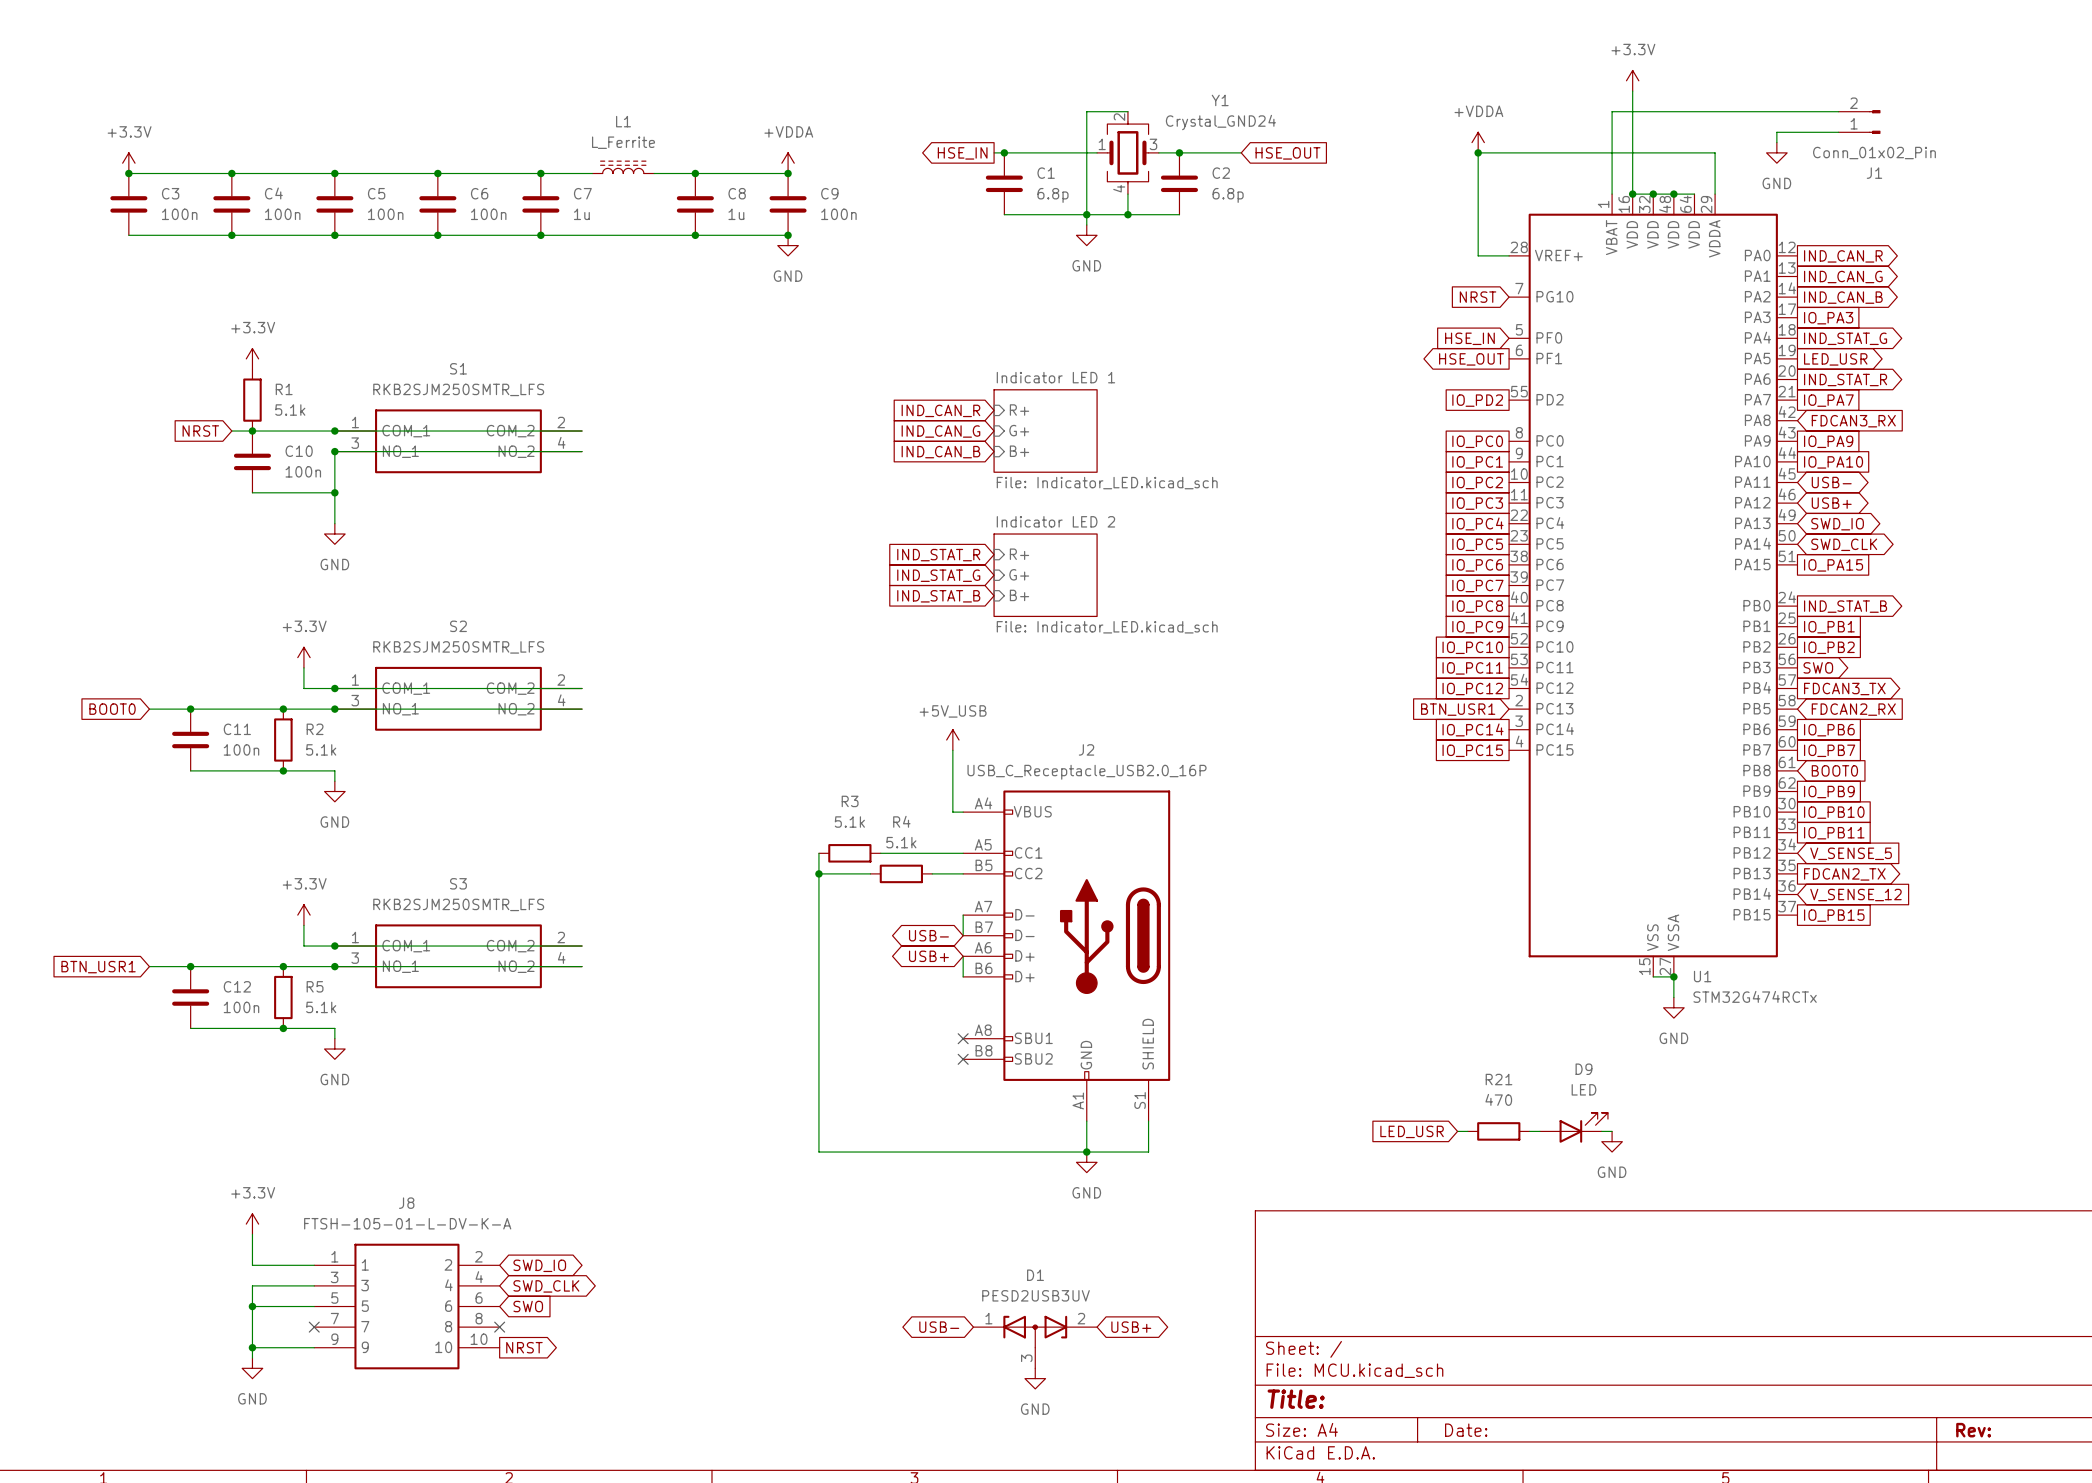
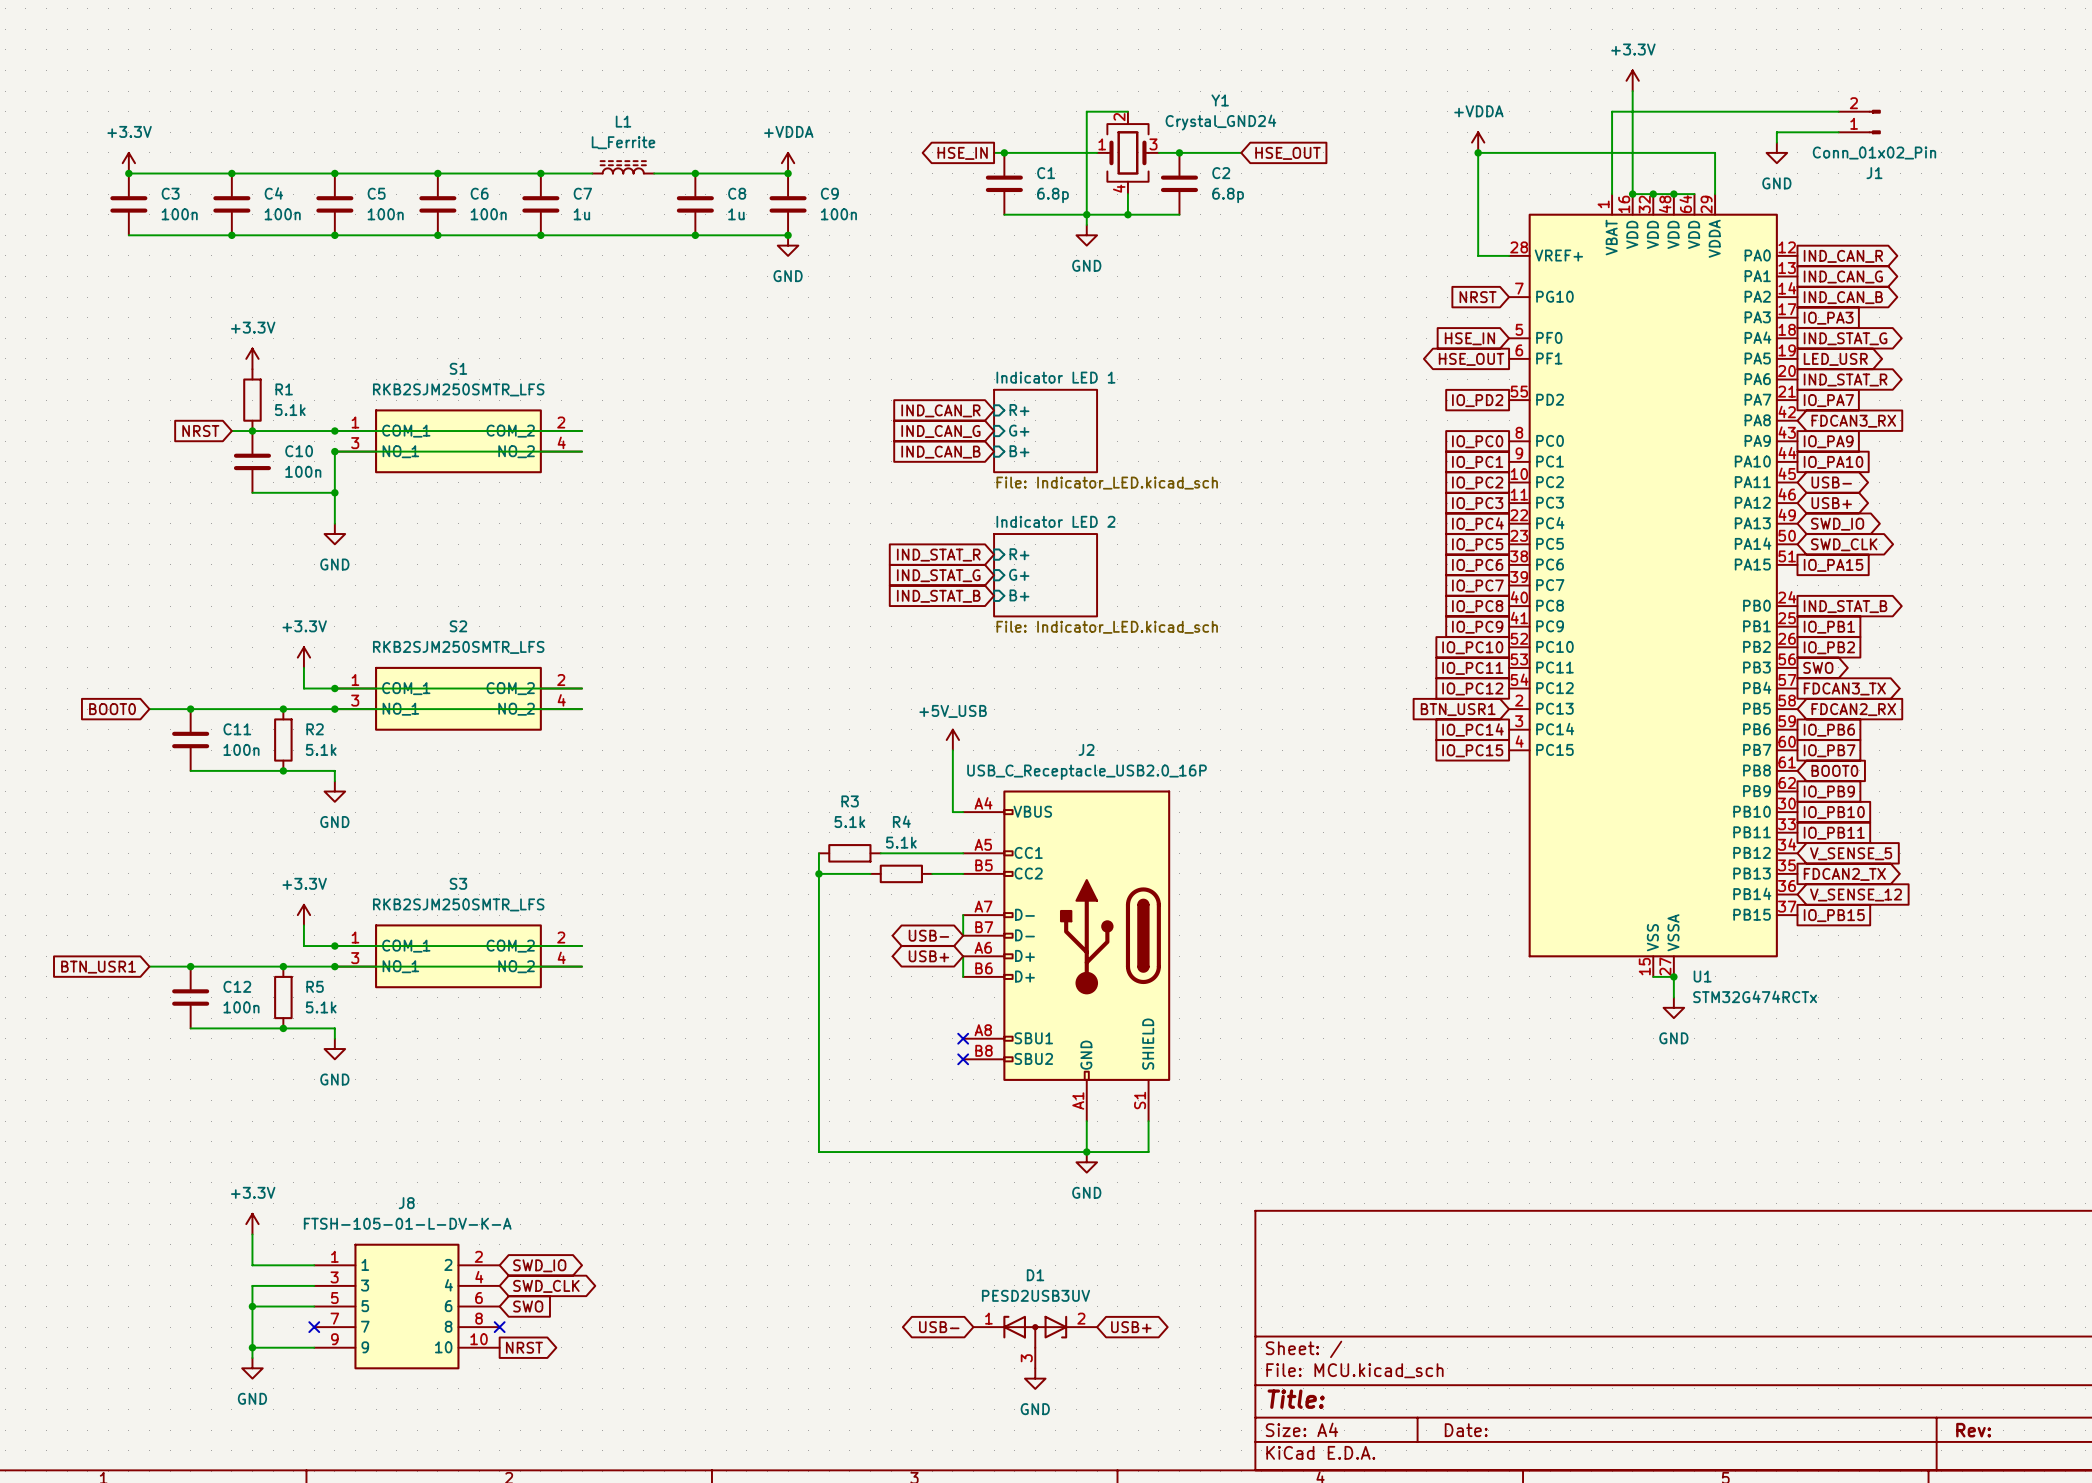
D9: LED (1573, 1127) -> none
global label: LED_USR (1412, 1131) -> none
wire: (1457, 1131) (1467, 1131) -> none
R21: 470 (1498, 1131) -> none
wire: (1529, 1131) (1539, 1131) -> none
wire: (1601, 1131) (1612, 1131) -> none
power symbol: GND (1612, 1141) -> none

